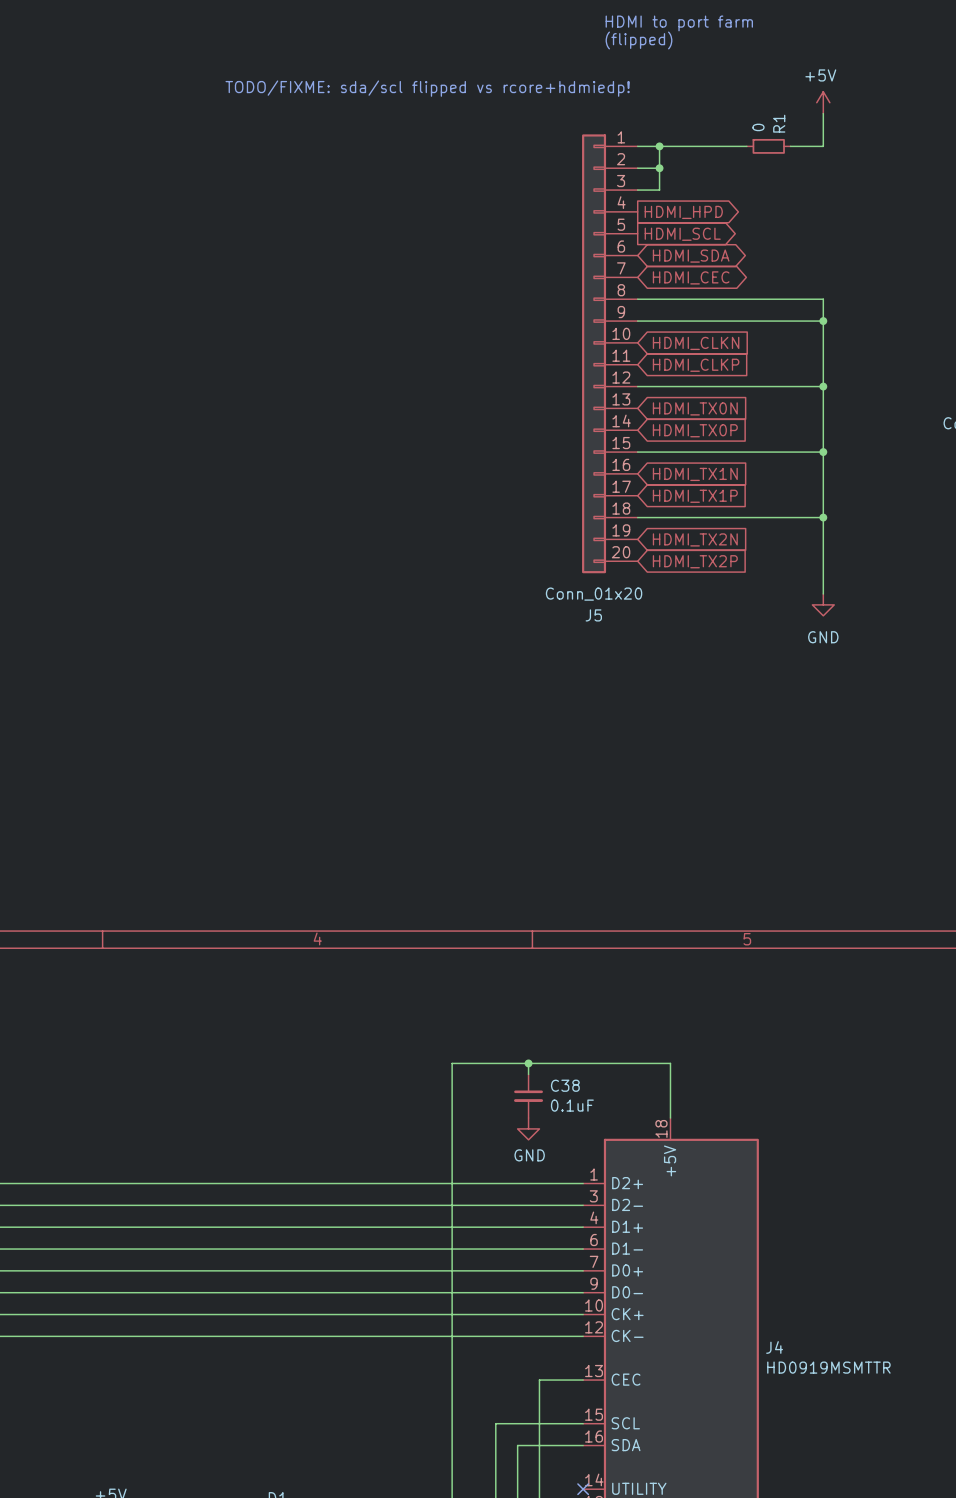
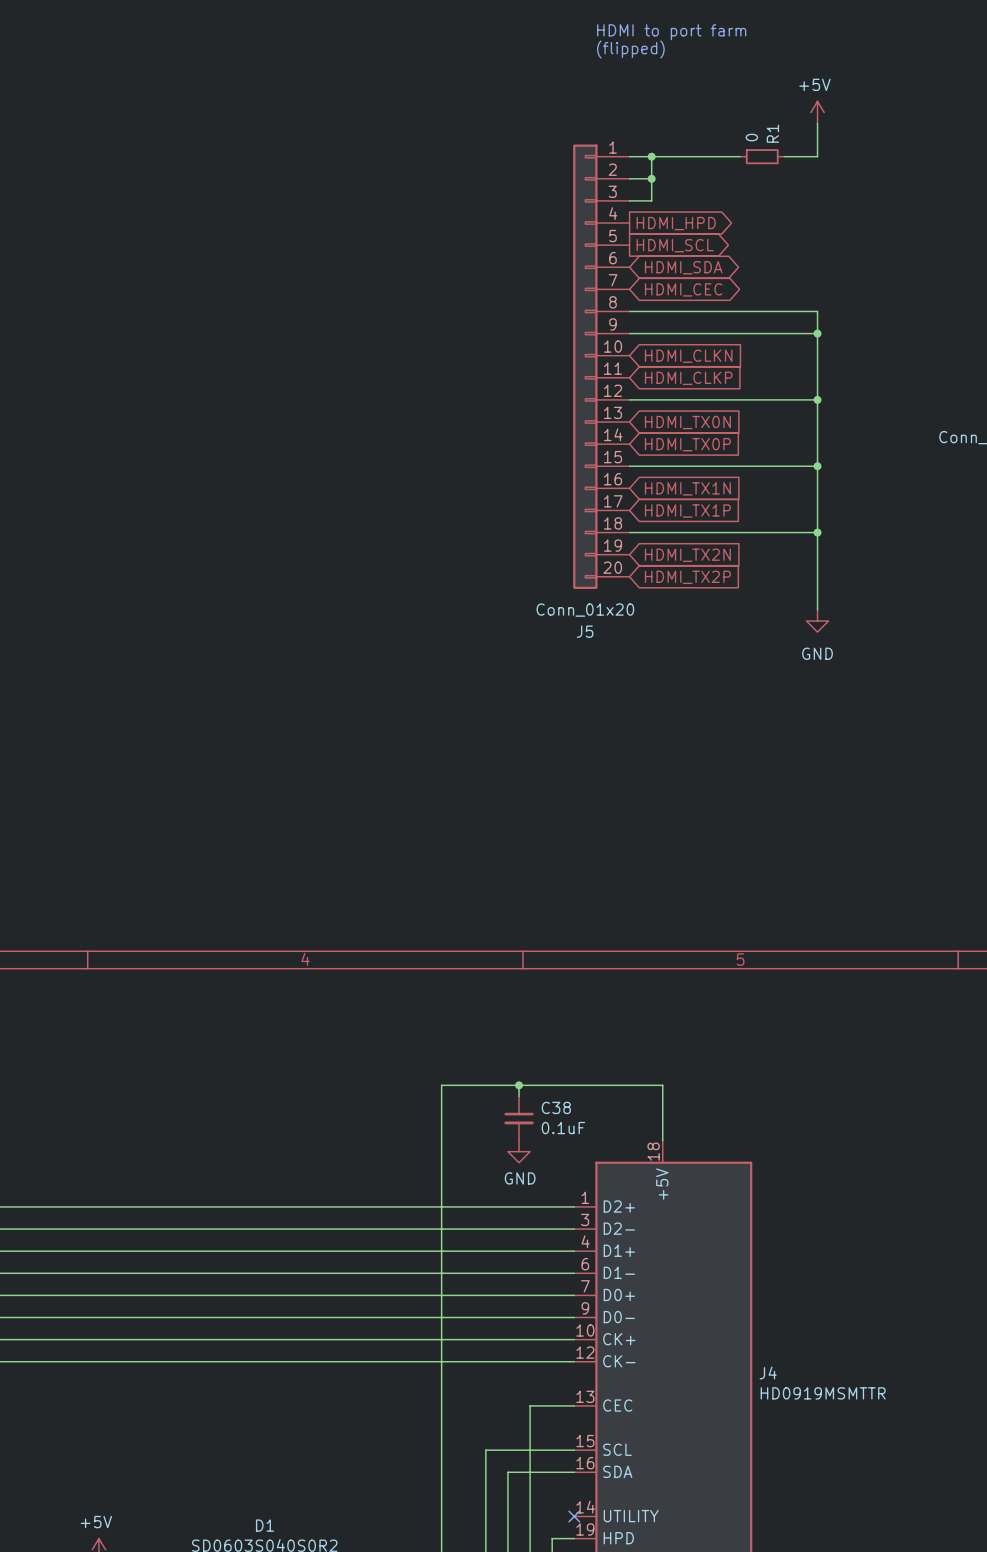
text: TODO/FIXME: sda/scl flipped vs rcore+hdmiedp! (427, 88) -> none

